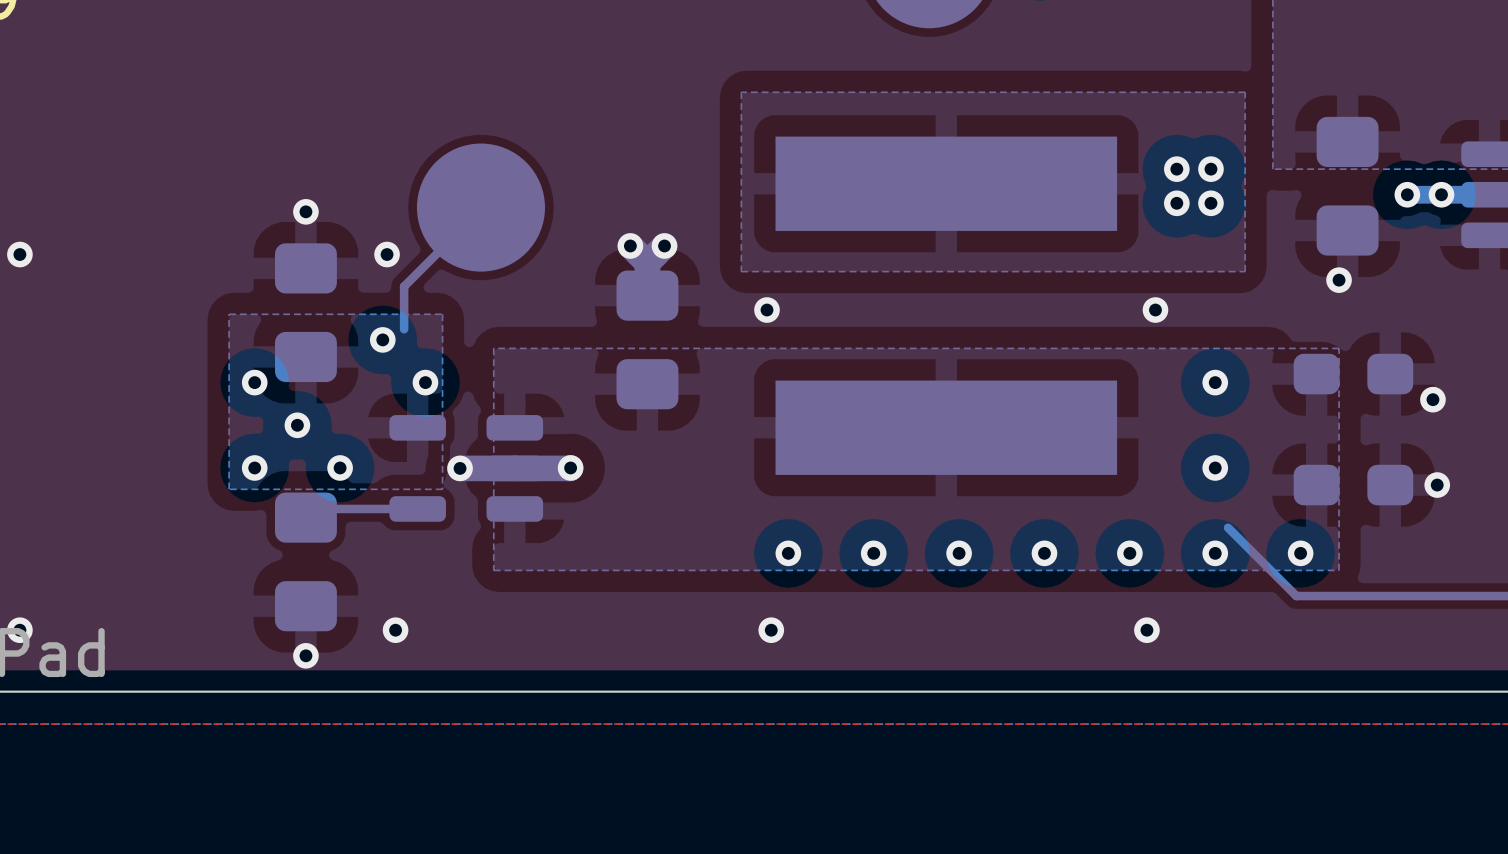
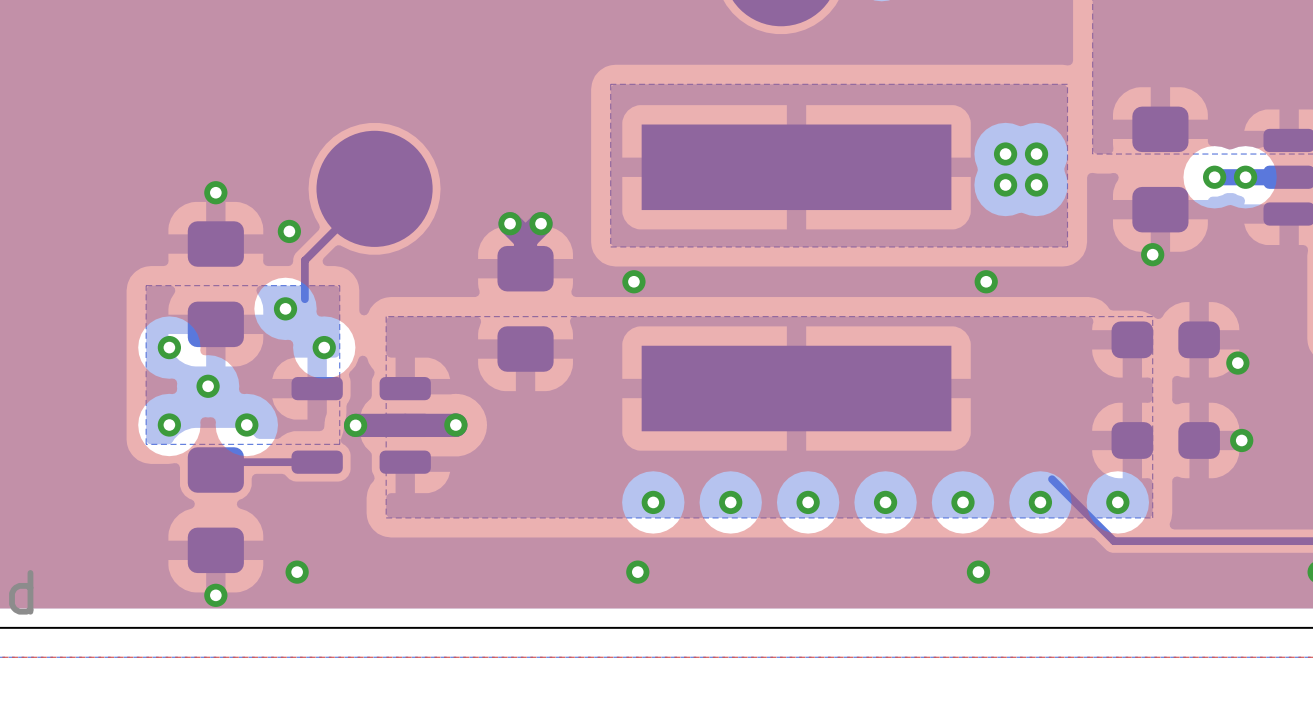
via: (1215, 382) -> none
via: (1215, 467) -> none

